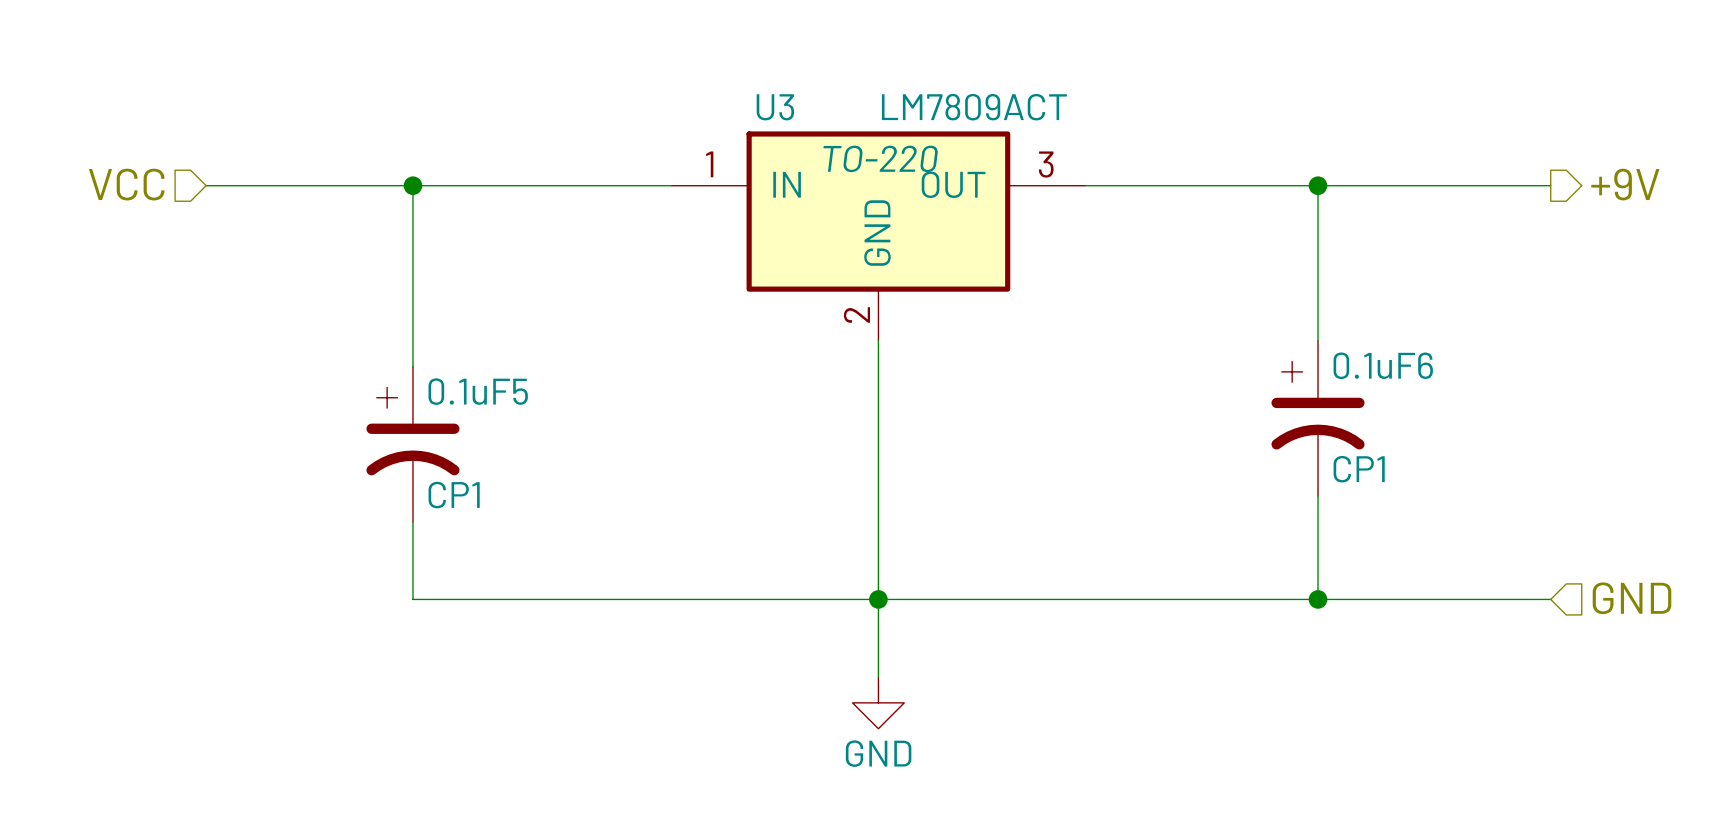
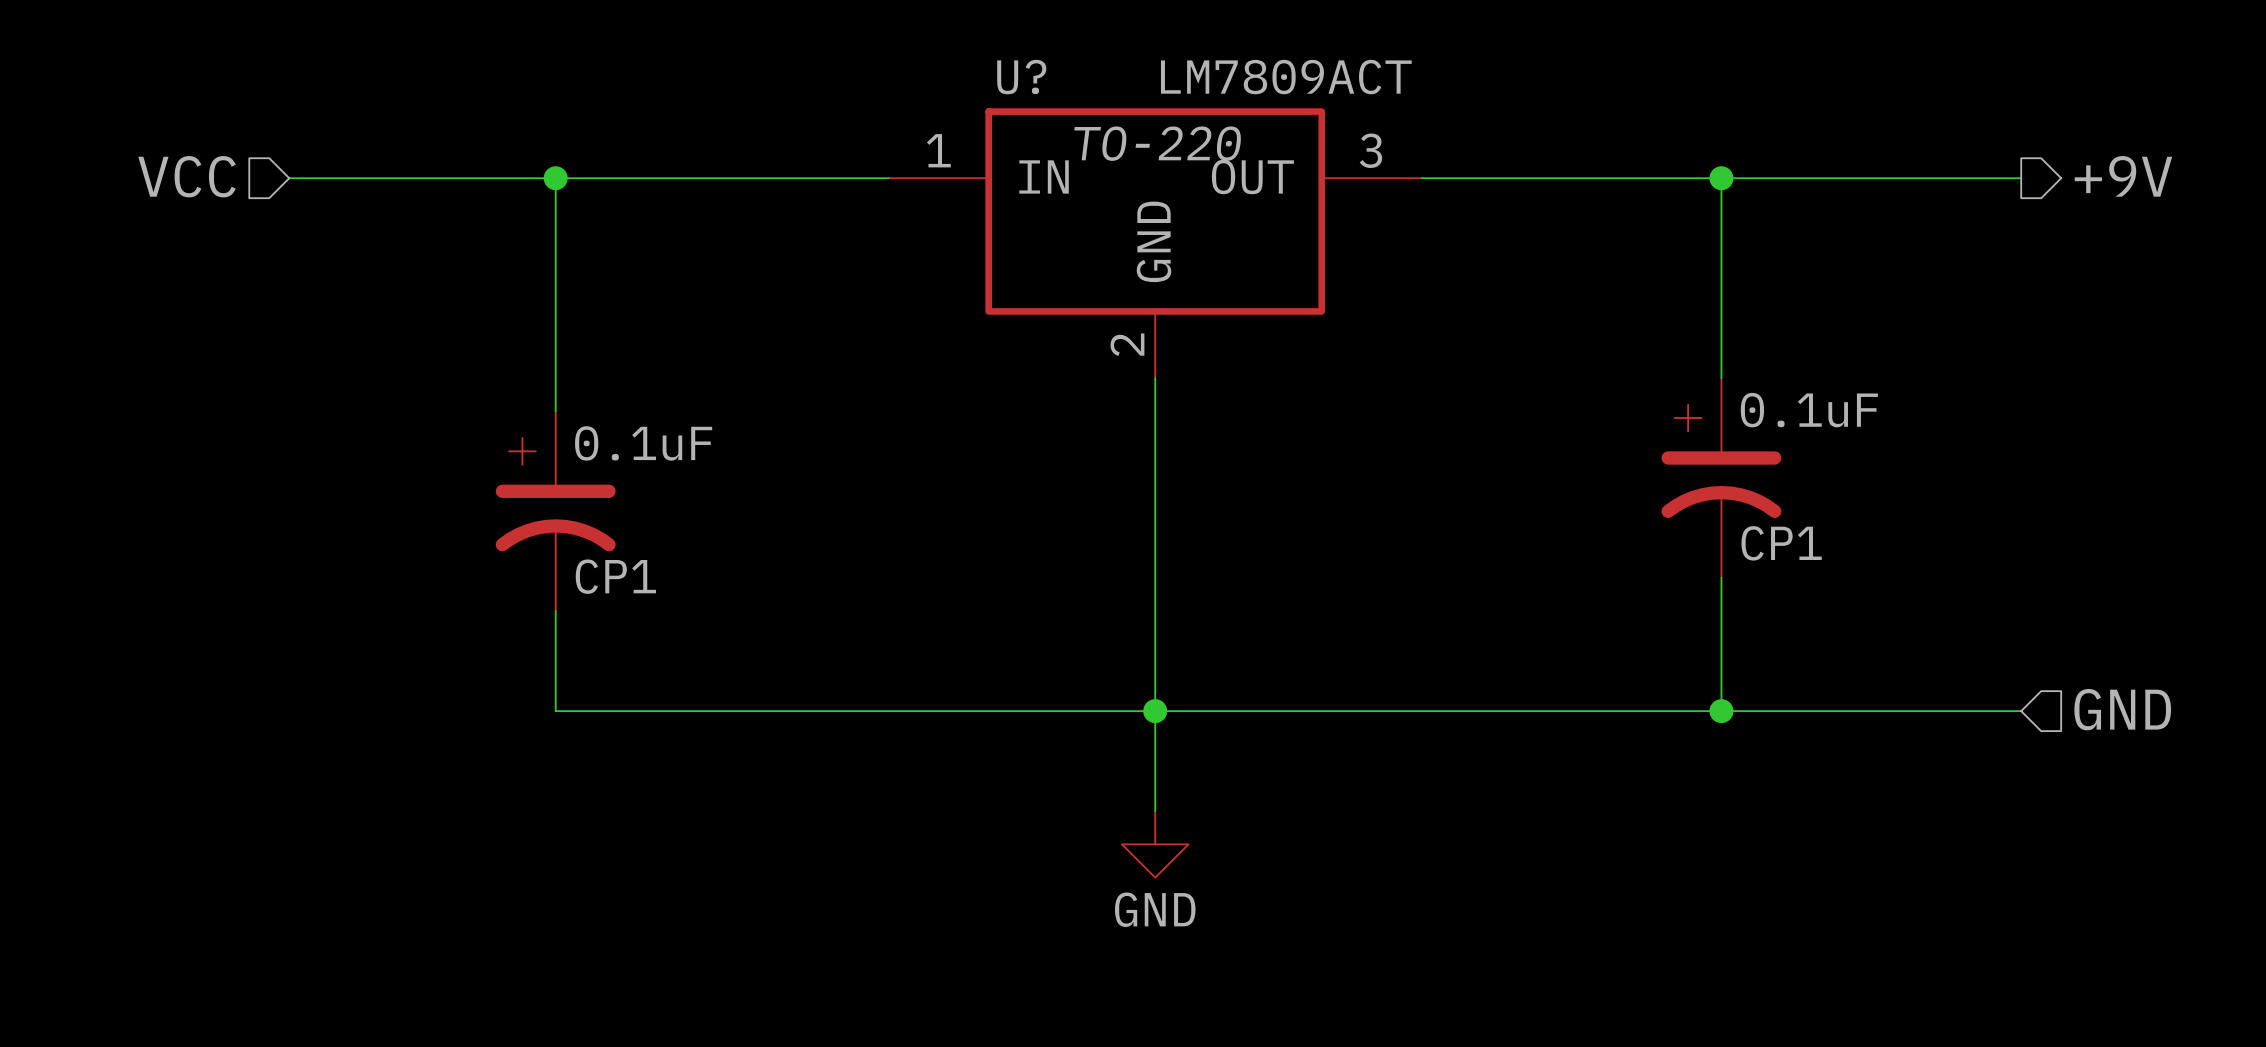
U3 name: U3 (775, 107) -> U? (1021, 77)
0.1uF6 name: 0.1uF6 (1383, 365) -> 0.1uF (1809, 410)
0.1uF5 name: 0.1uF5 (478, 391) -> 0.1uF (643, 443)

